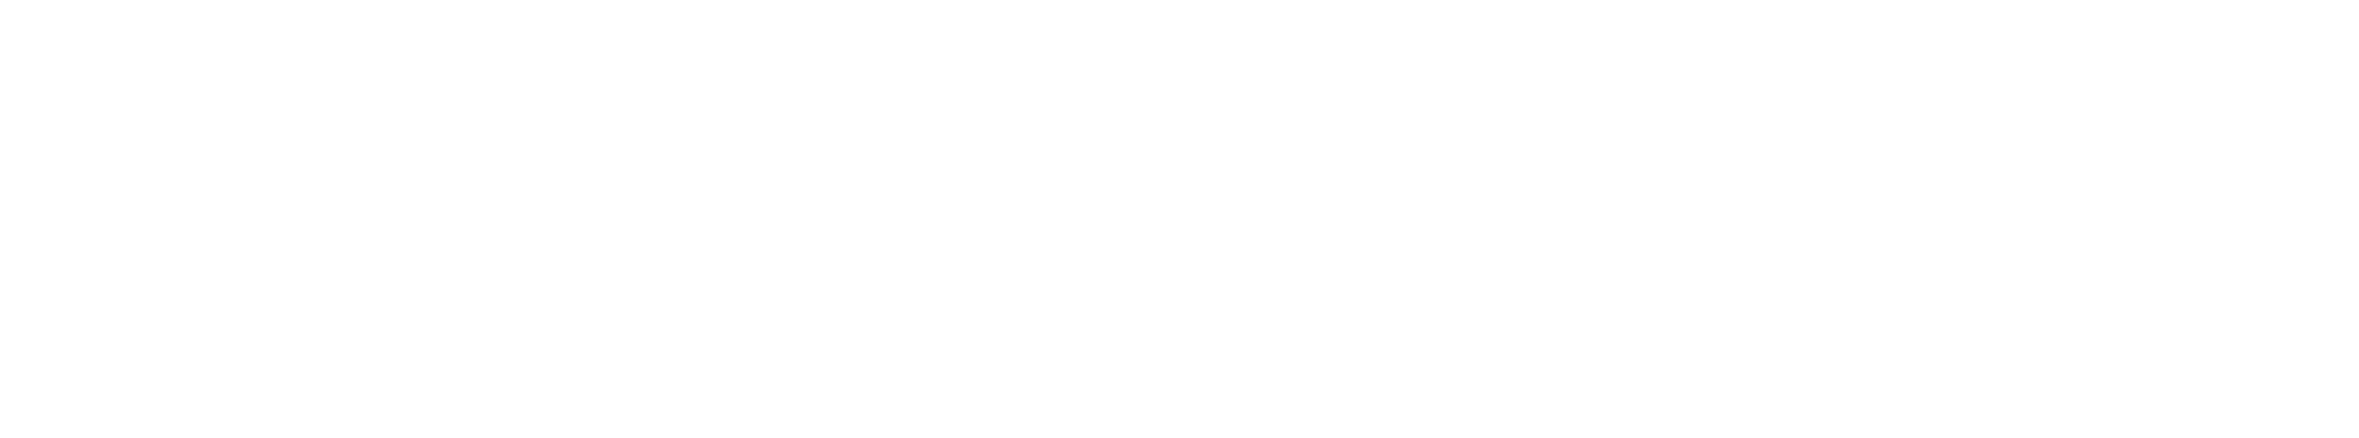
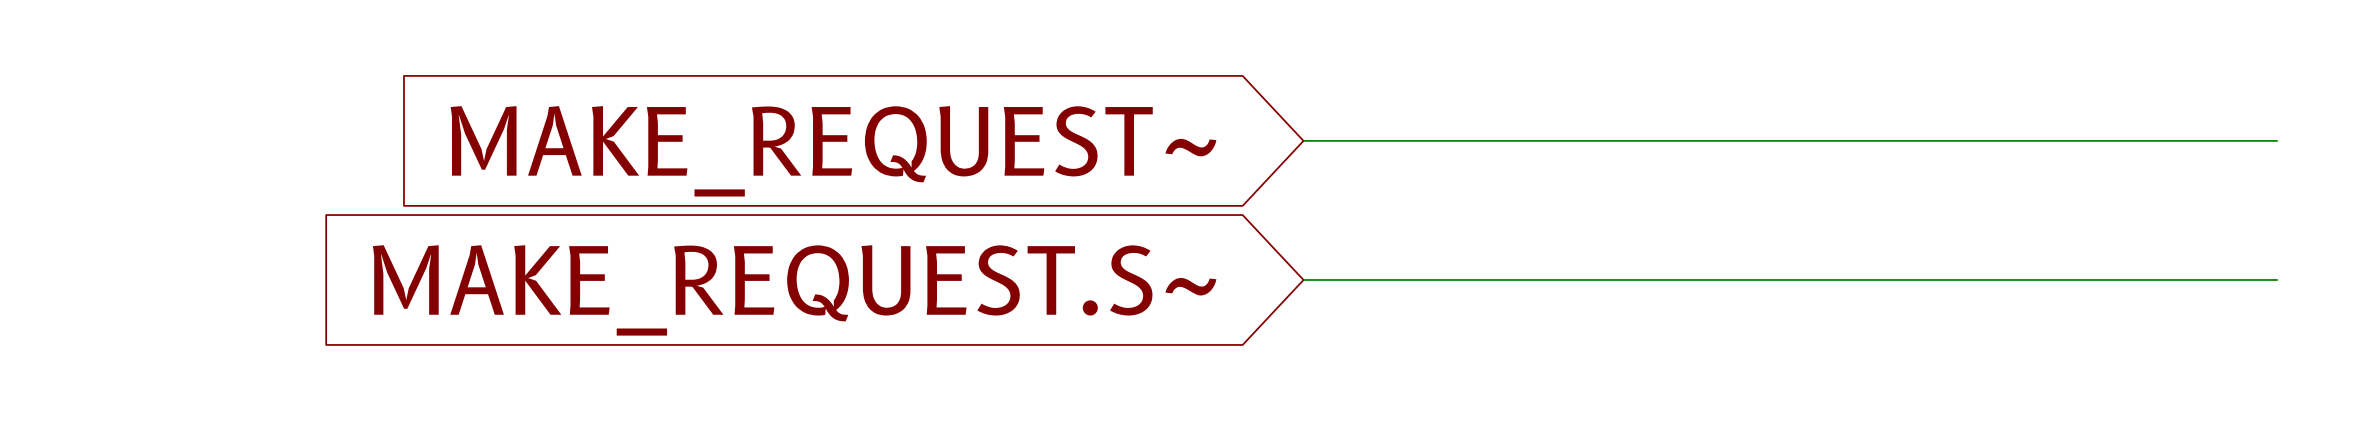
wire: none -> (1303, 140) (2277, 140)
global label: none -> MAKE_REQUEST~ (833, 151)
wire: none -> (1303, 279) (2277, 279)
global label: none -> MAKE_REQUEST.S~ (794, 290)

